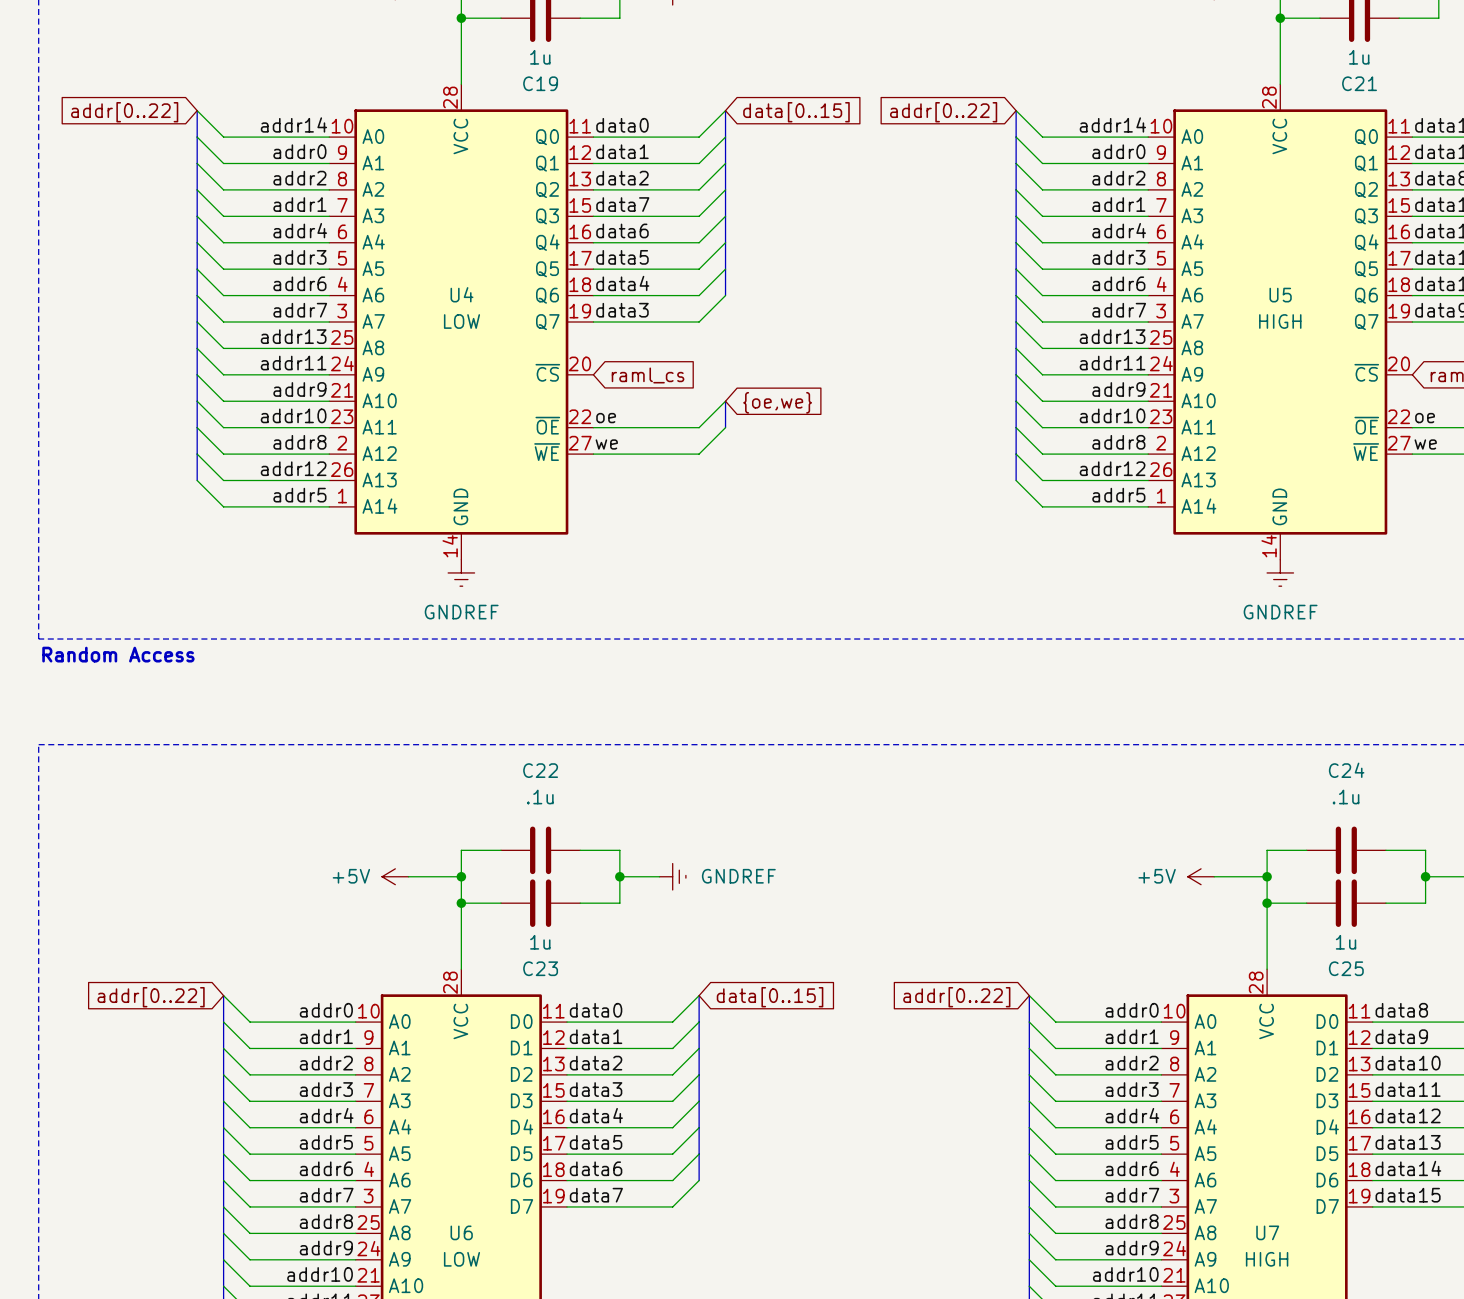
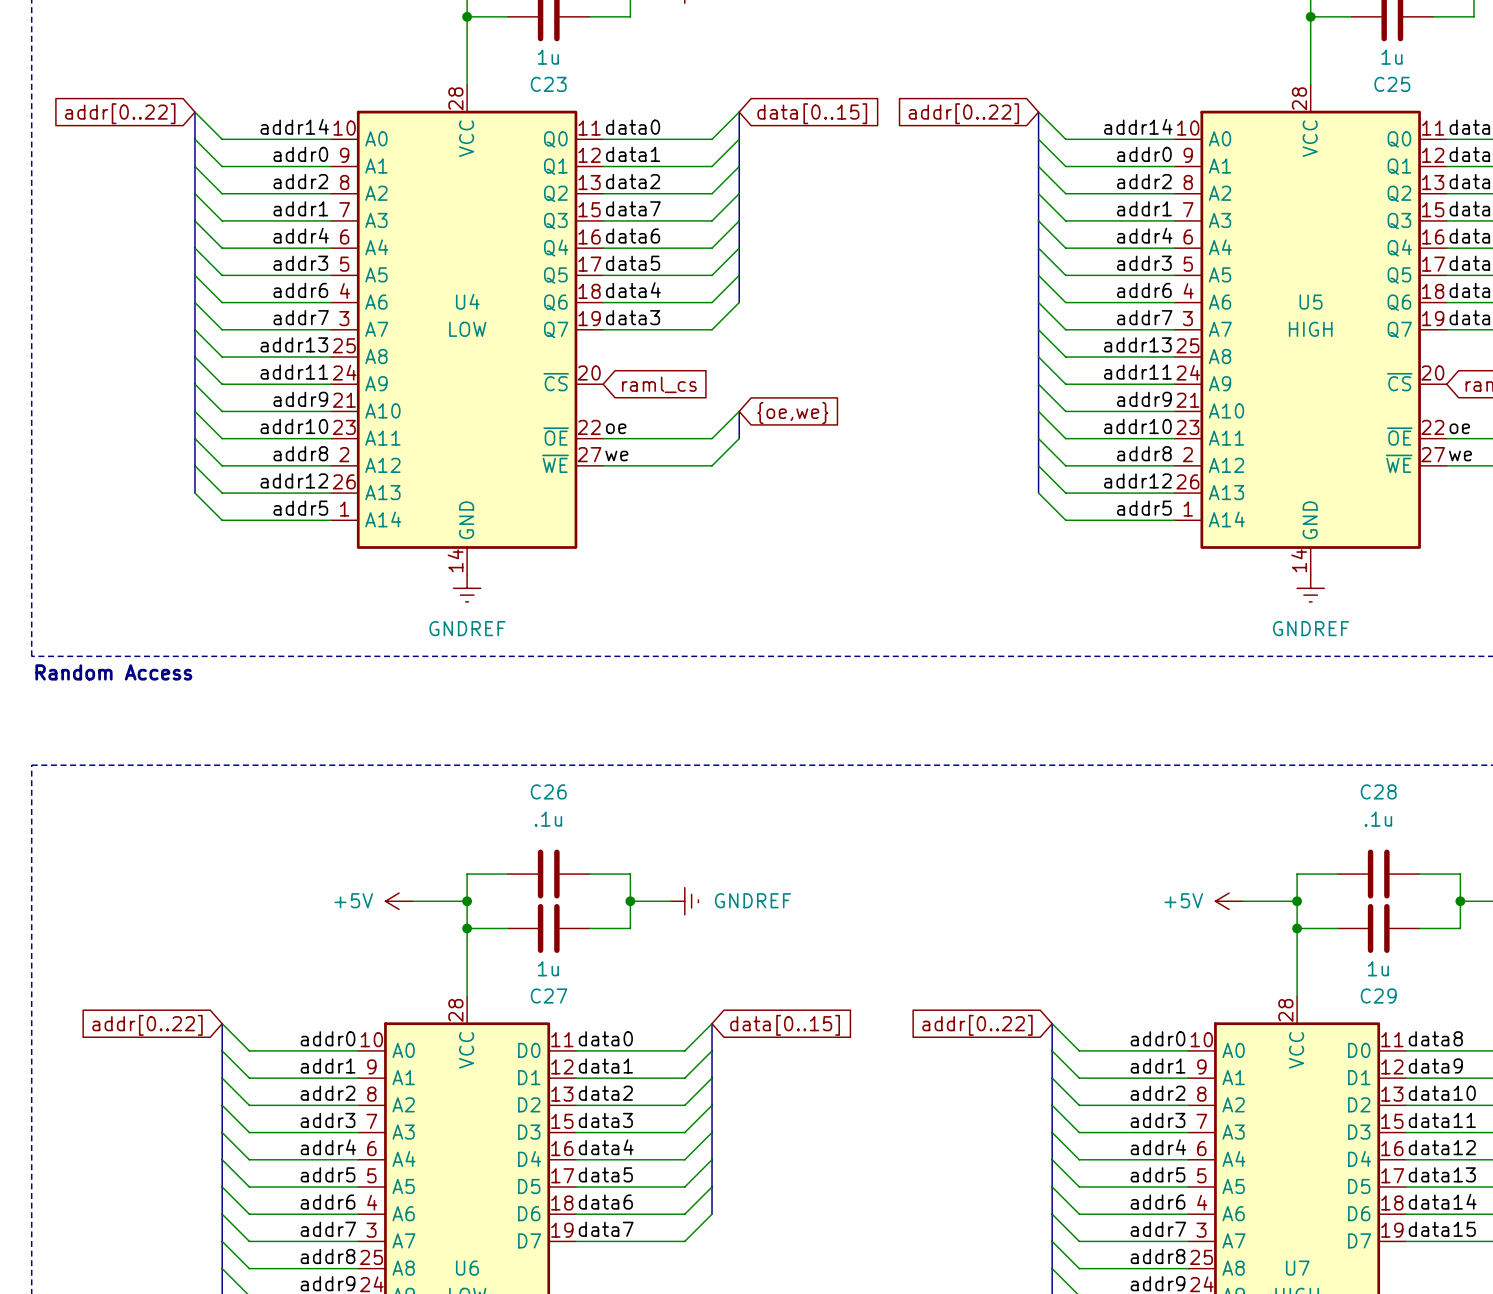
C19 name: C19 (540, 83) -> C23 (548, 84)
C21 name: C21 (1359, 83) -> C25 (1392, 84)
C22 name: C22 (540, 770) -> C26 (548, 791)
C24 name: C24 (1346, 770) -> C28 (1378, 791)
C23 name: C23 (540, 968) -> C27 (549, 996)
C25 name: C25 (1346, 968) -> C29 (1378, 996)

